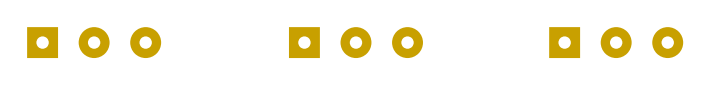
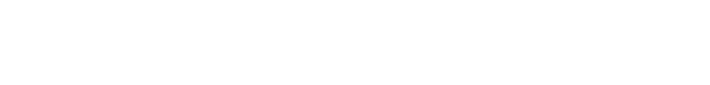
part: (94, 42) -> none
part: (355, 42) -> none
part: (616, 42) -> none

